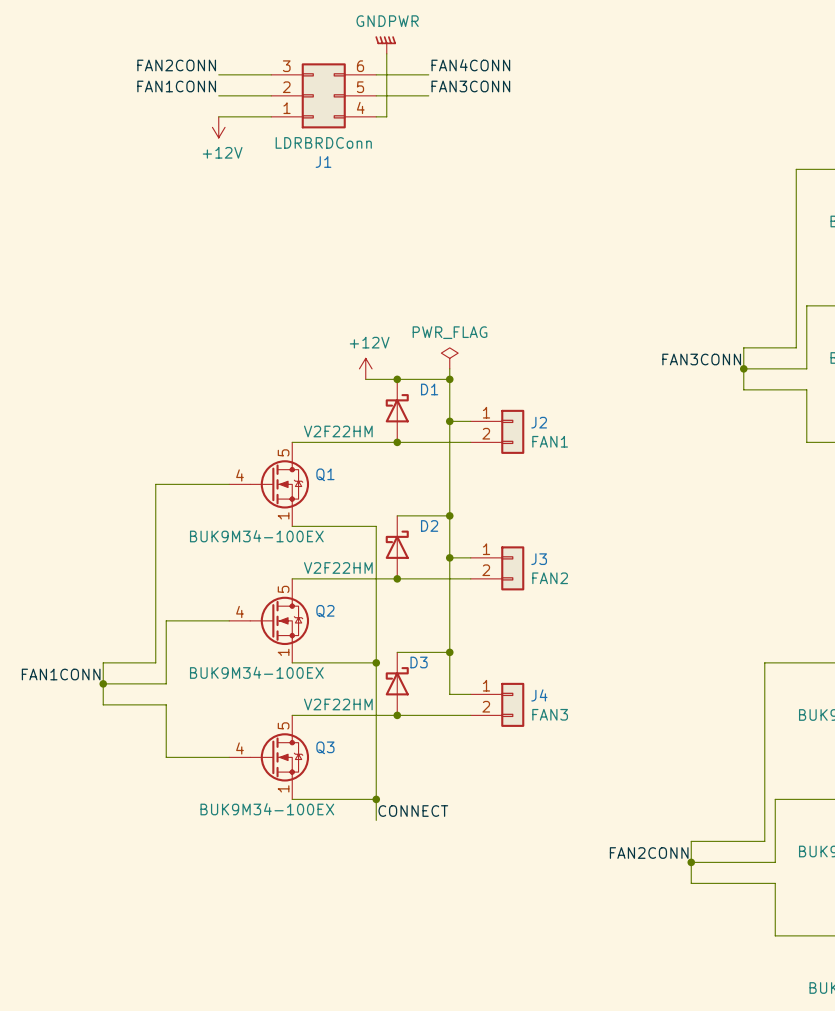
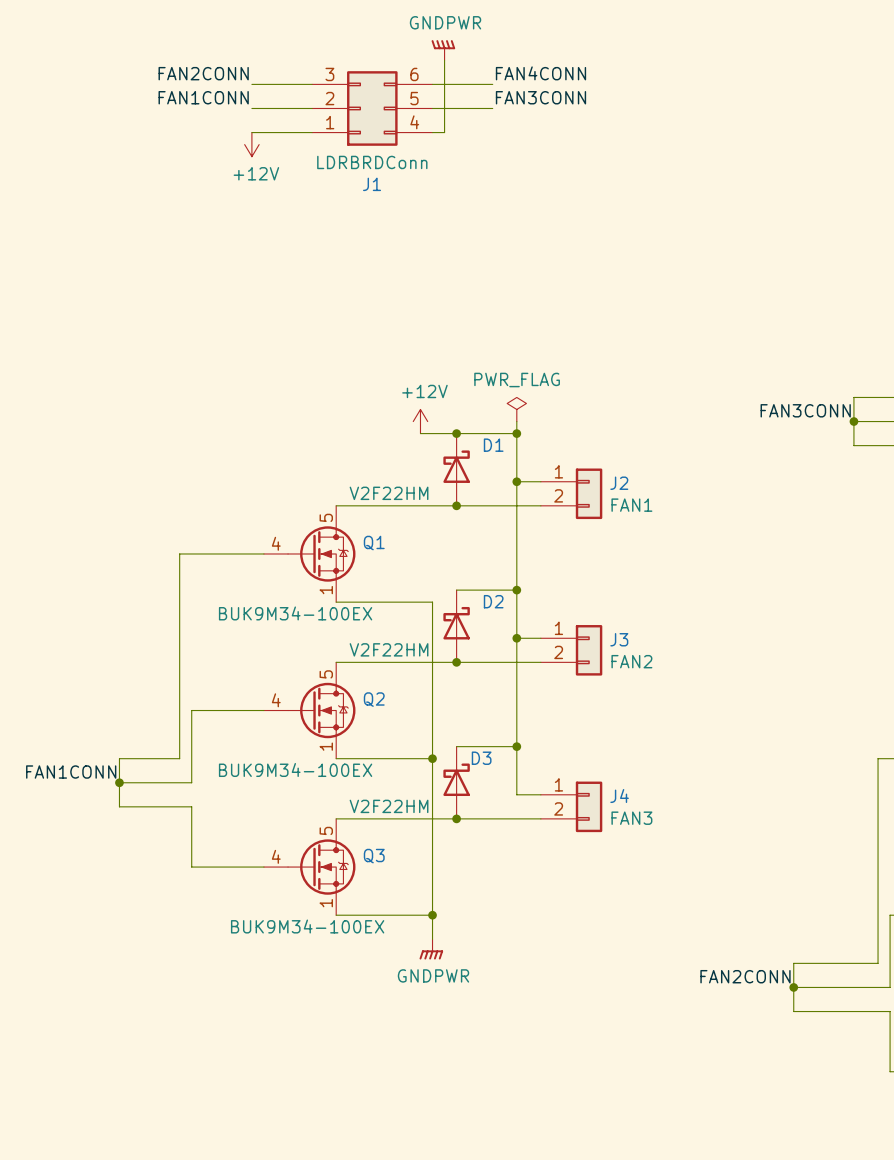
label: CONNECT (413, 811) -> none
power symbol: none -> GNDPWR (431, 949)

